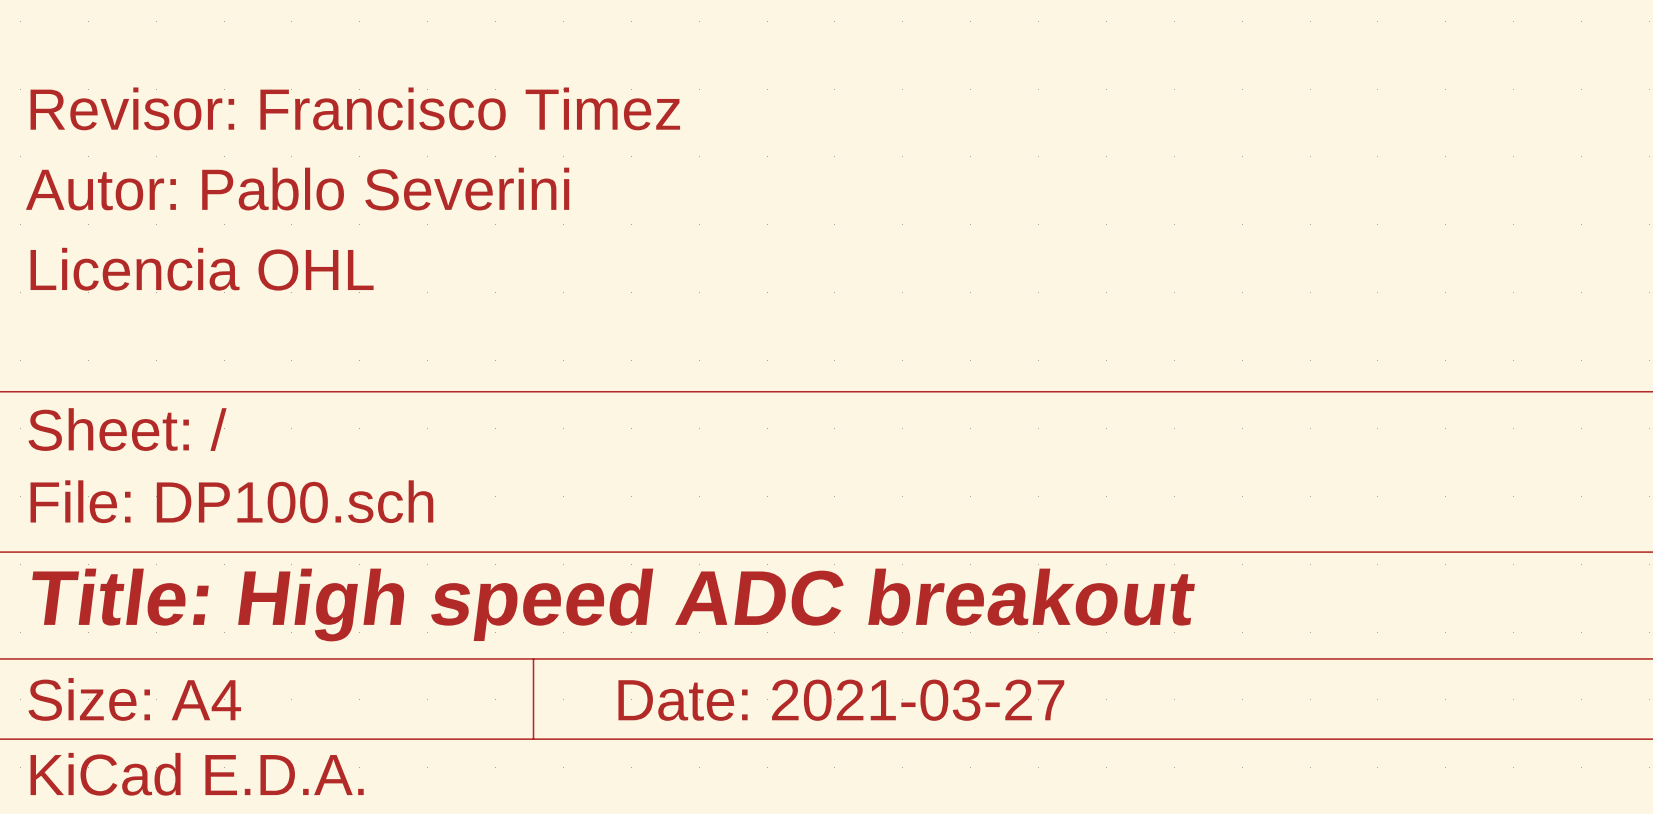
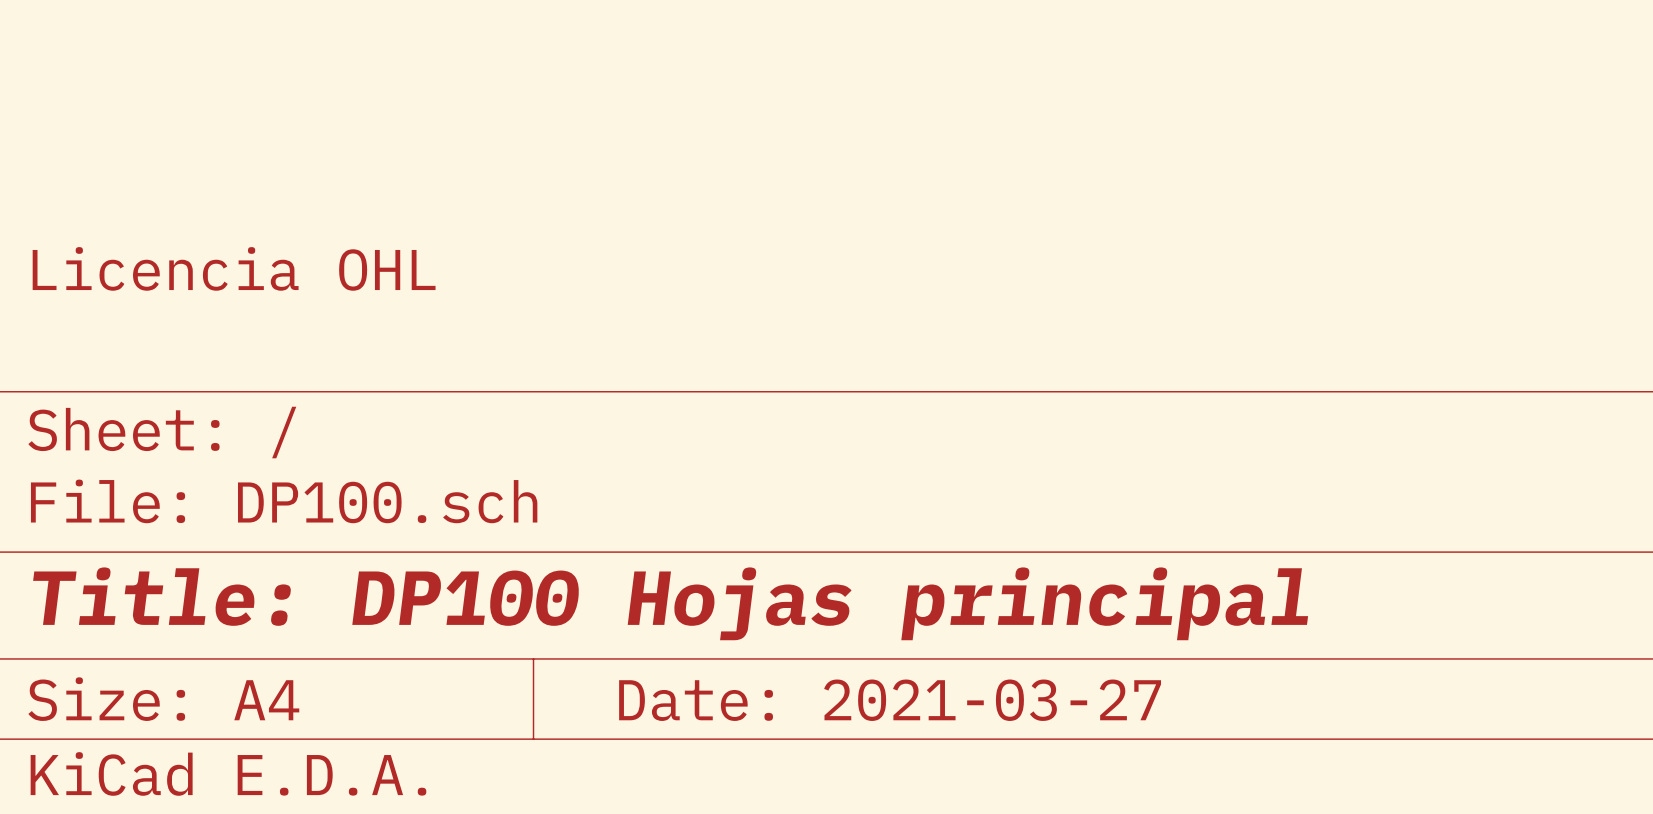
title block: Revisor: Francisco Timez (355, 108) -> none
title block: Autor: Pablo Severini (297, 189) -> none
title block: Title: High speed ADC breakout (613, 604) -> Title: DP100 Hojas principal (670, 603)

